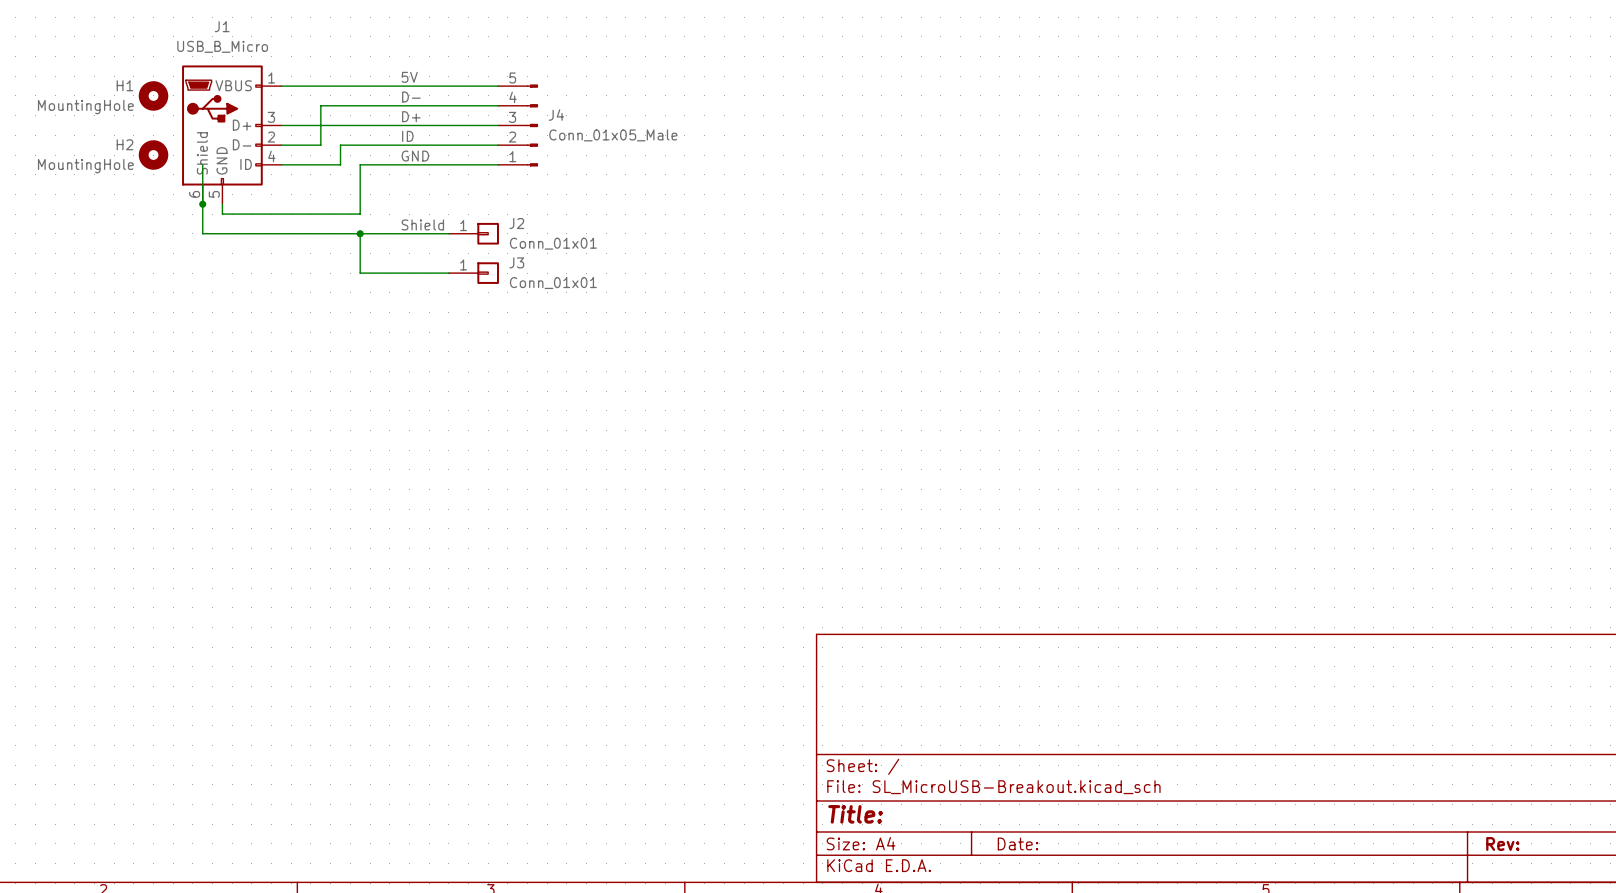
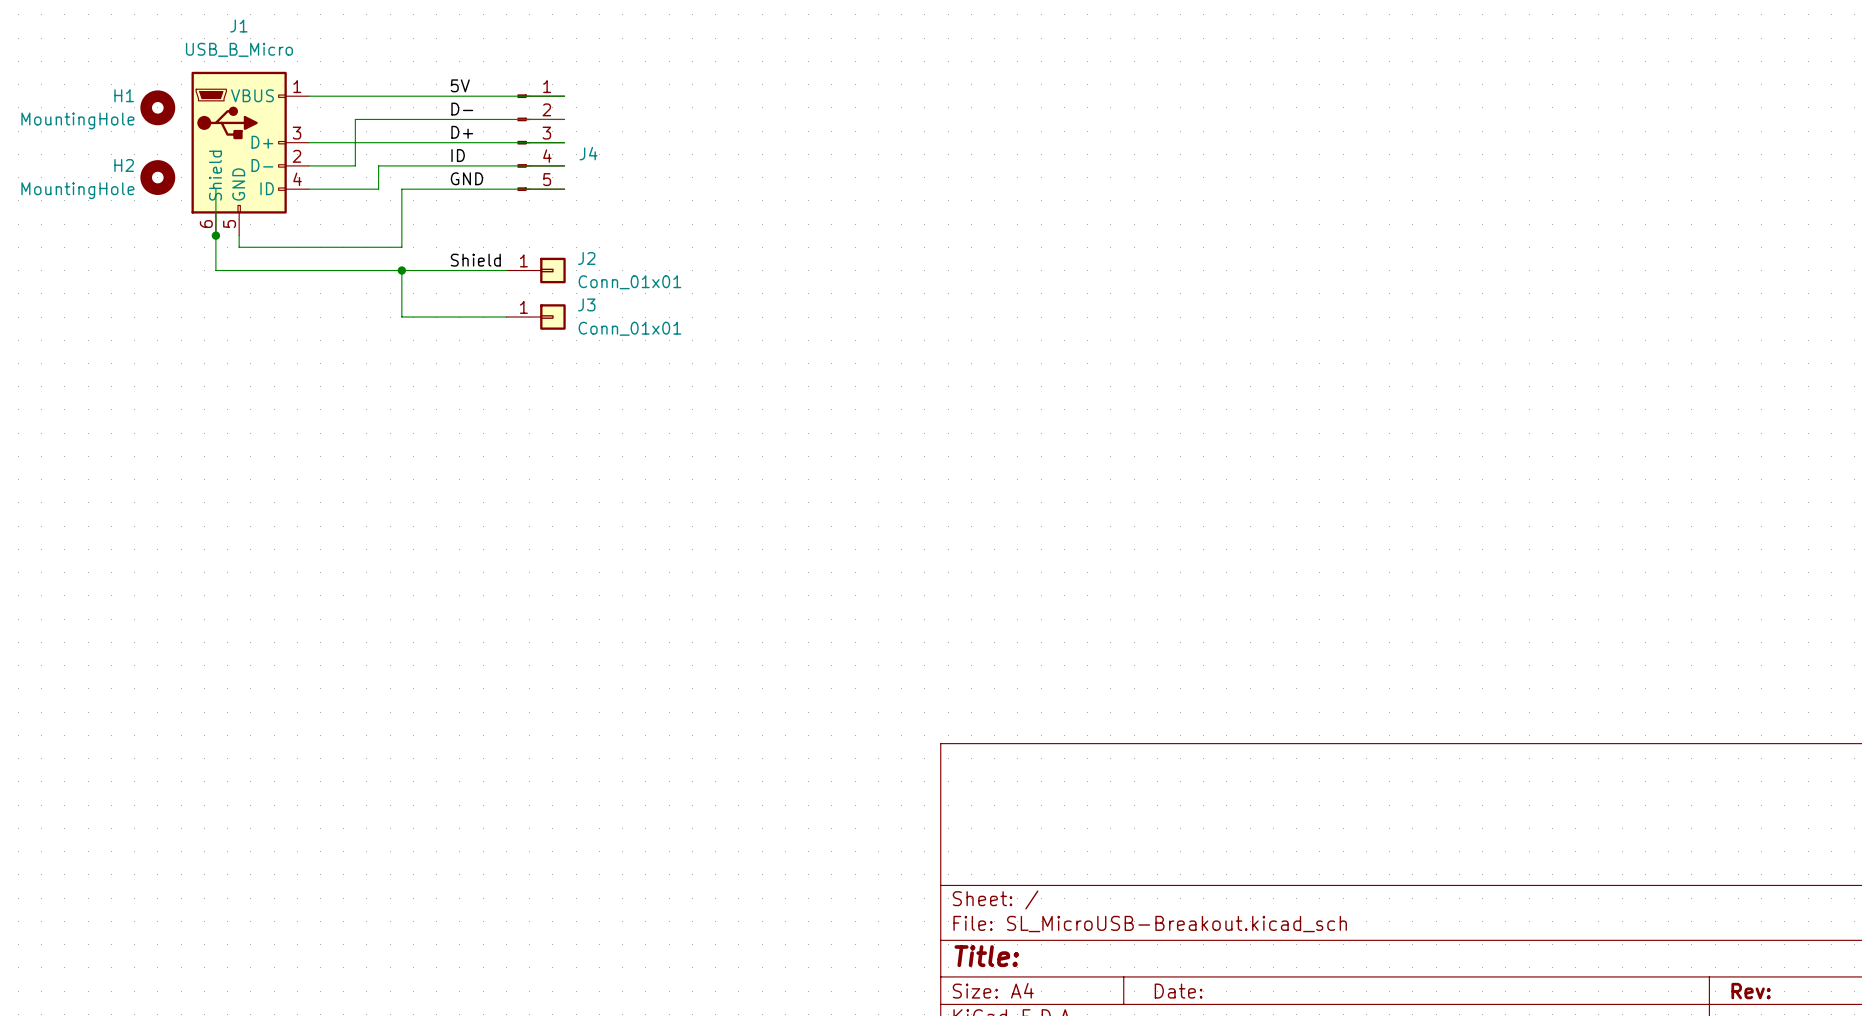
J4 name position: J4 (556, 115) -> J4 (588, 153)
J4 rotation: 0° (532, 125) -> 180° (523, 142)
J4 value: Conn_01x05_Male (613, 135) -> none

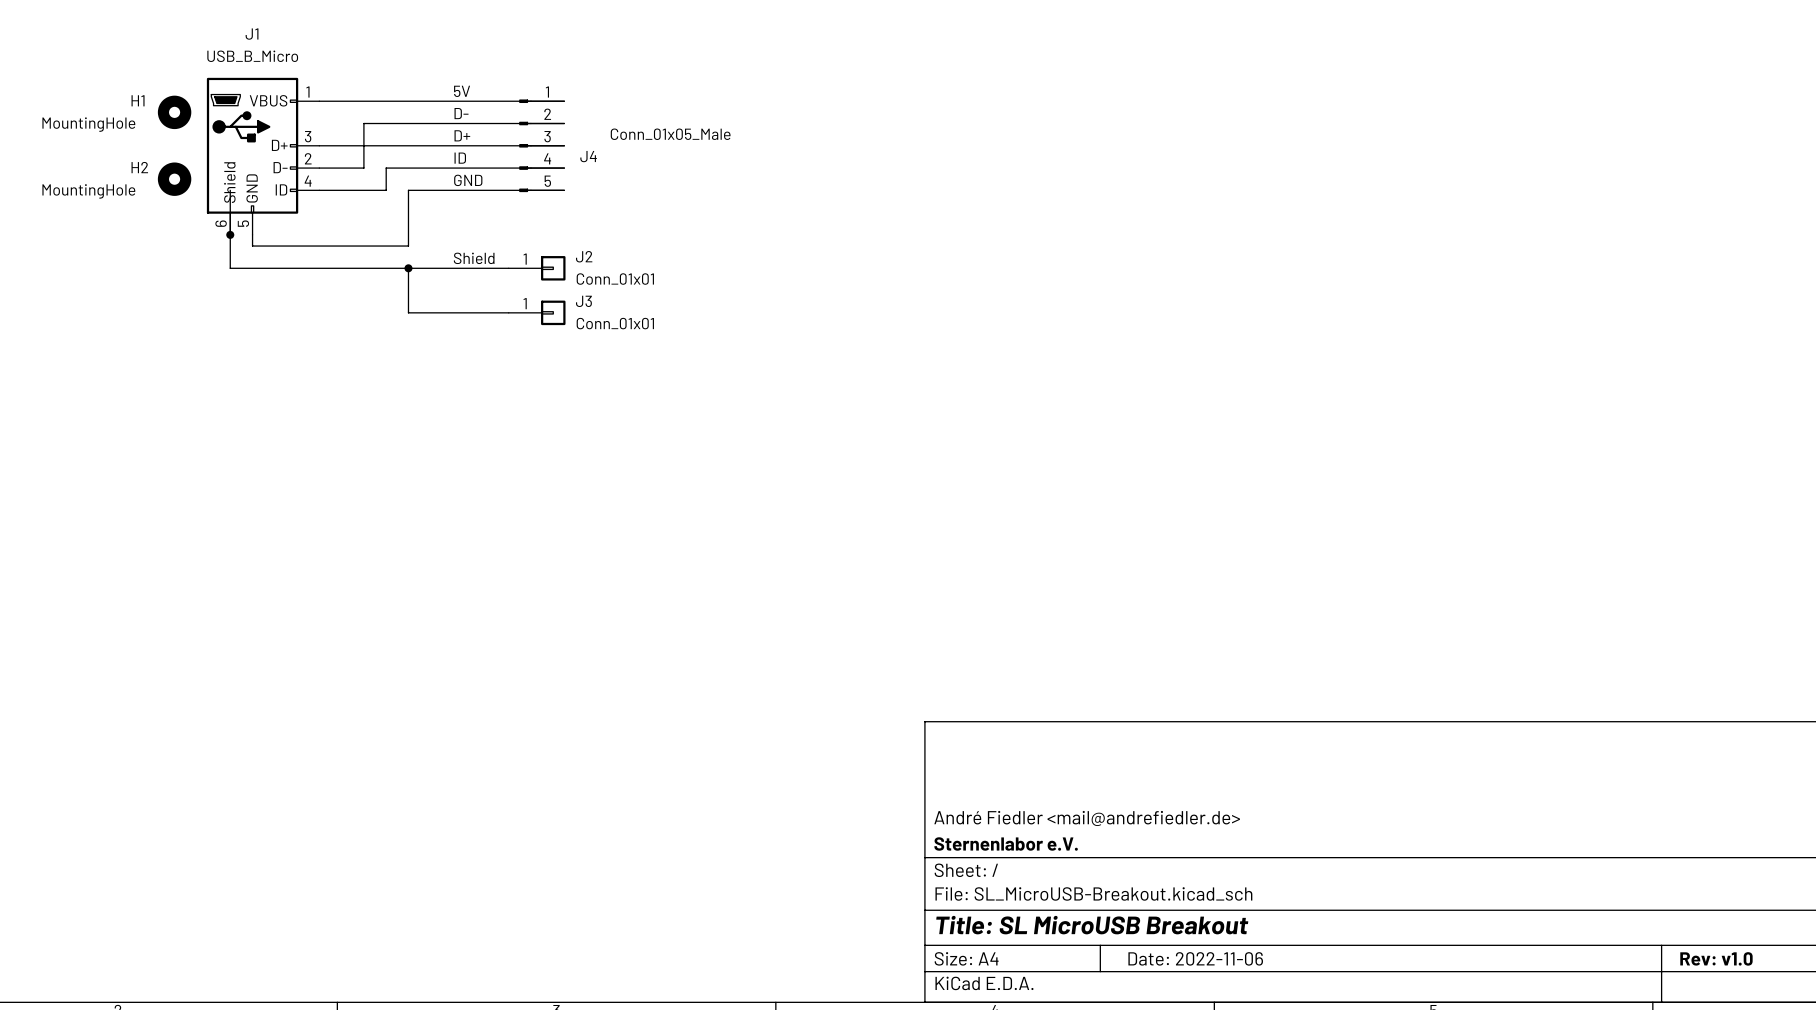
J4 value: none -> Conn_01x05_Male (670, 134)
title block: none -> André Fiedler <mail@andrefiedler.de> (1087, 818)
title block: none -> Sternenlabor e.V. (1006, 843)
title block: Title: (986, 956) -> Title: SL MicroUSB Breakout (1092, 925)
title block: Date: (1178, 991) -> Date: 2022-11-06 (1195, 958)
title block: Rev: (1751, 991) -> Rev: v1.0 (1716, 958)

